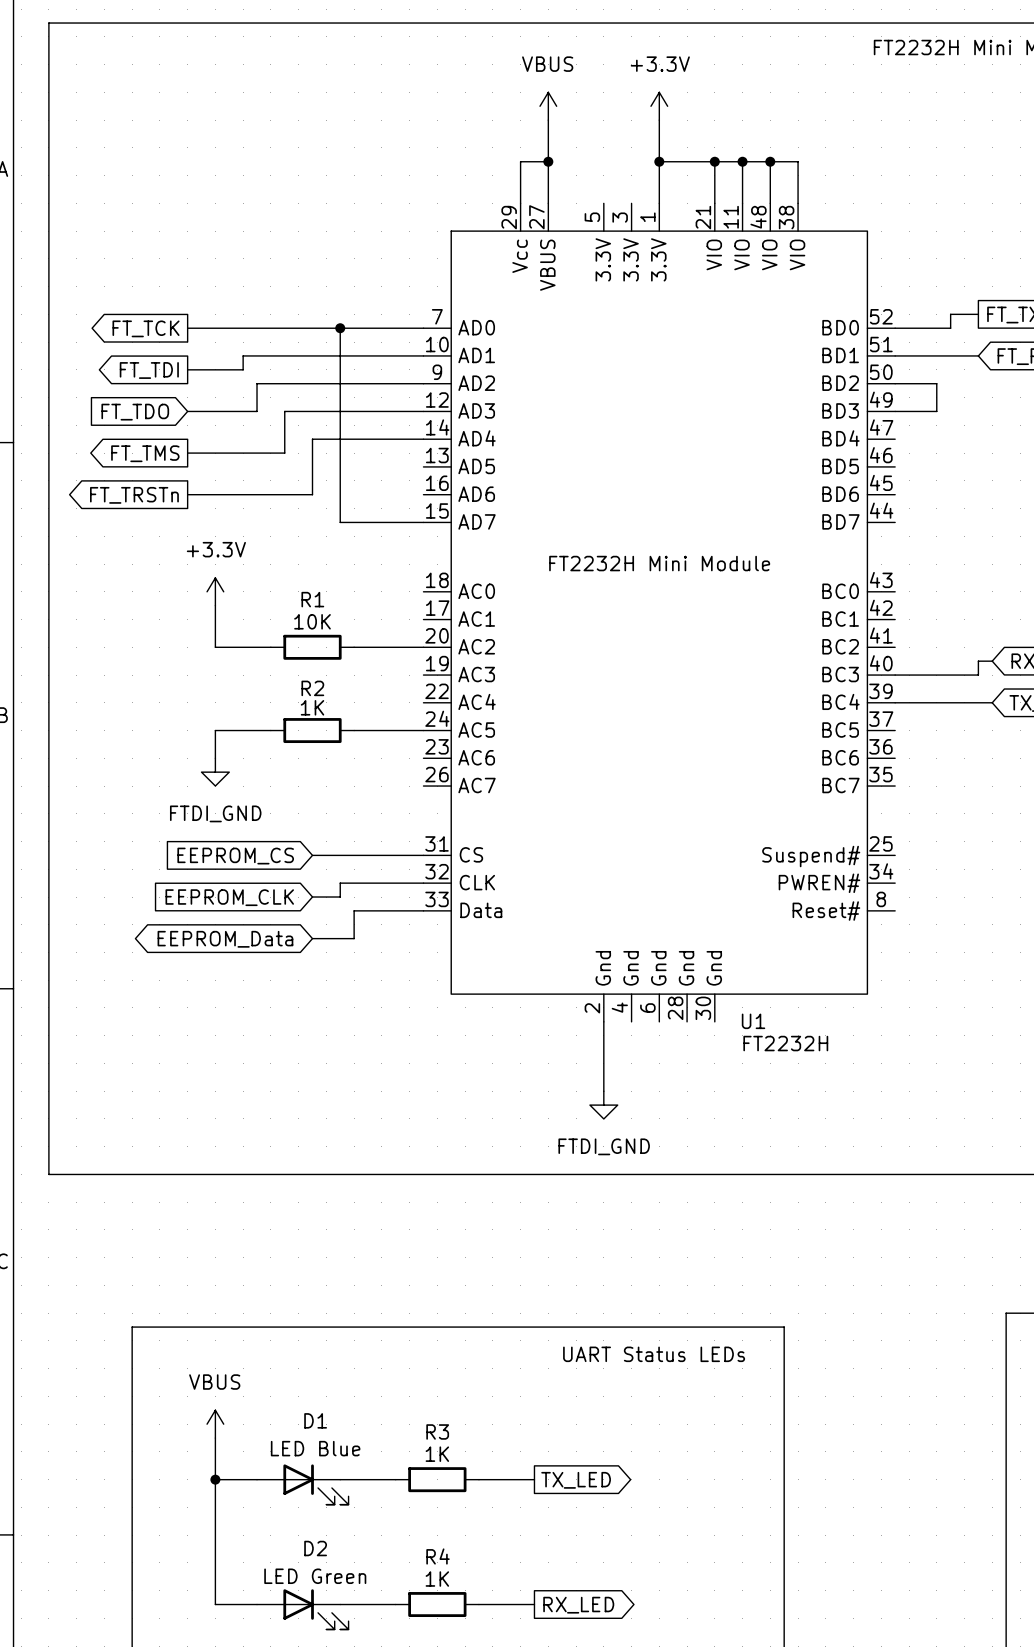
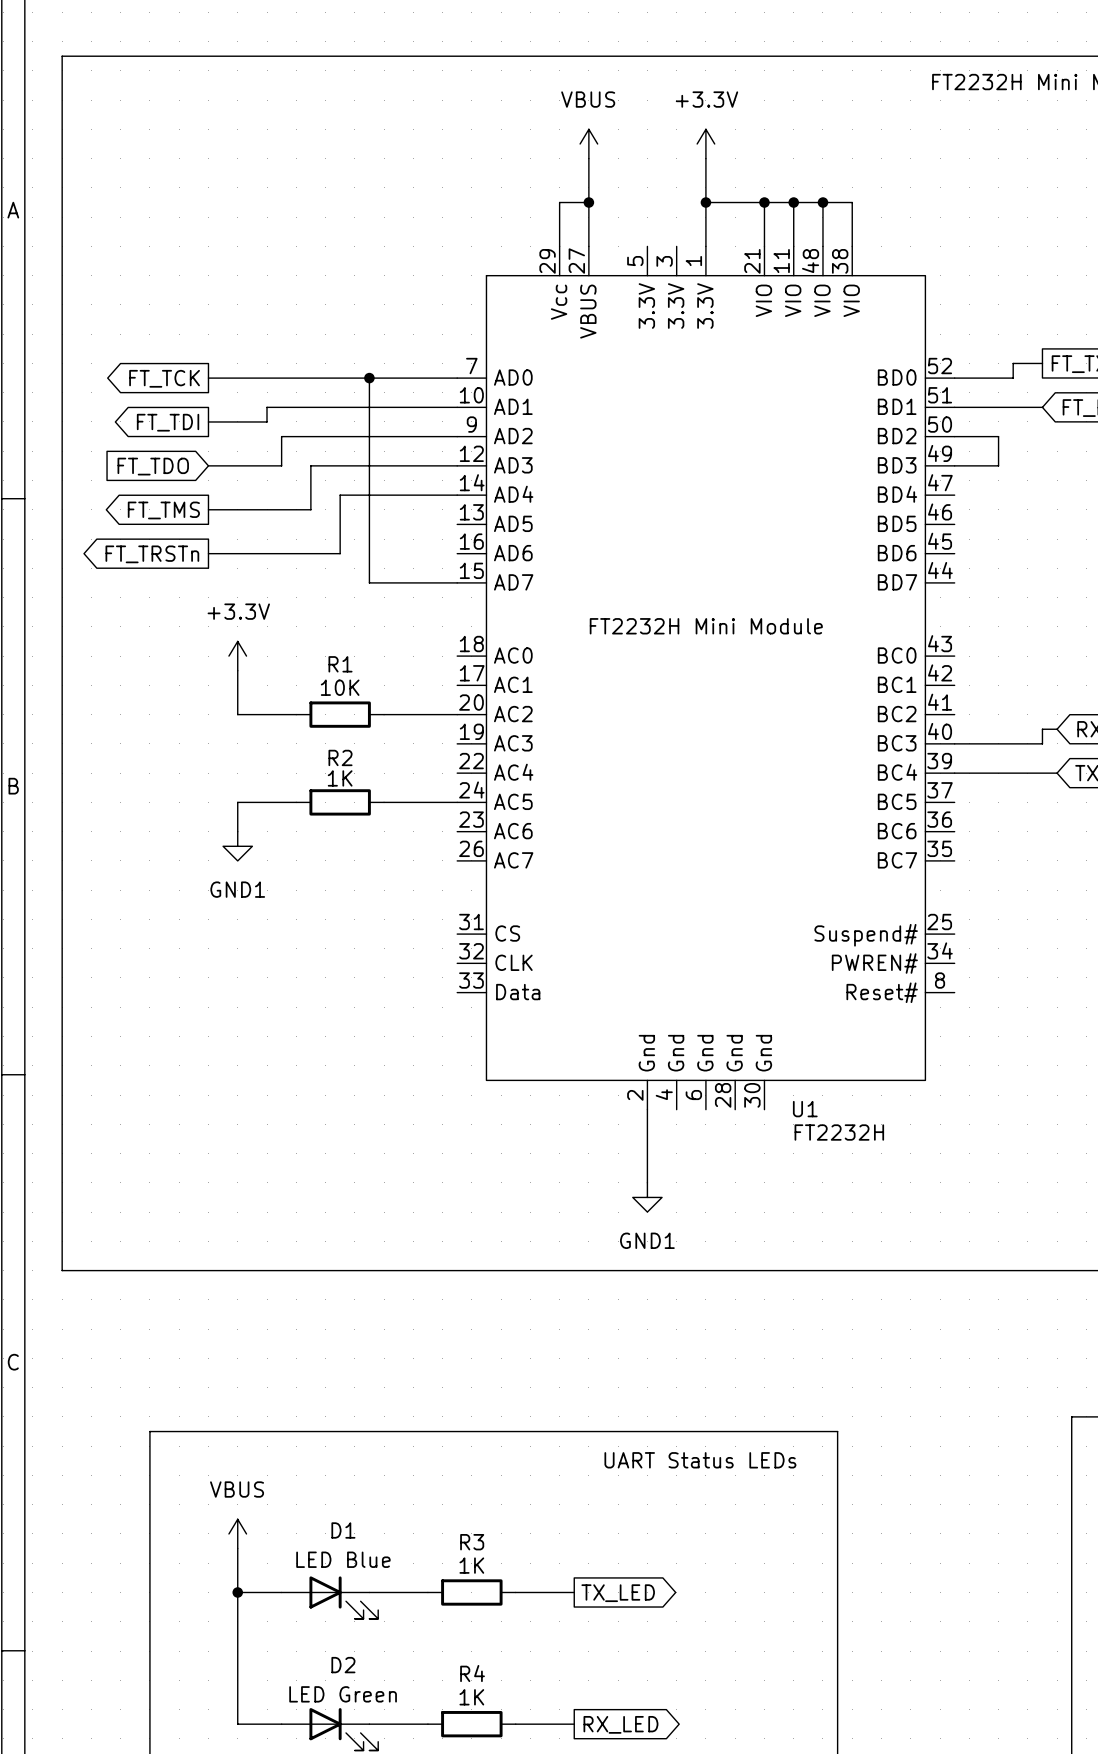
power symbol: FTDI_GND (215, 772) -> GND1 (237, 846)
wire: (312, 855) (423, 855) -> none
global label: EEPROM_CS (235, 856) -> none
wire: (423, 883) (340, 883) (340, 897) (312, 897) -> none
global label: EEPROM_CLK (229, 897) -> none
wire: (423, 910) (354, 910) (354, 938) (312, 938) -> none
global label: EEPROM_Data (225, 939) -> none
power symbol: FTDI_GND (603, 1105) -> GND1 (647, 1197)

